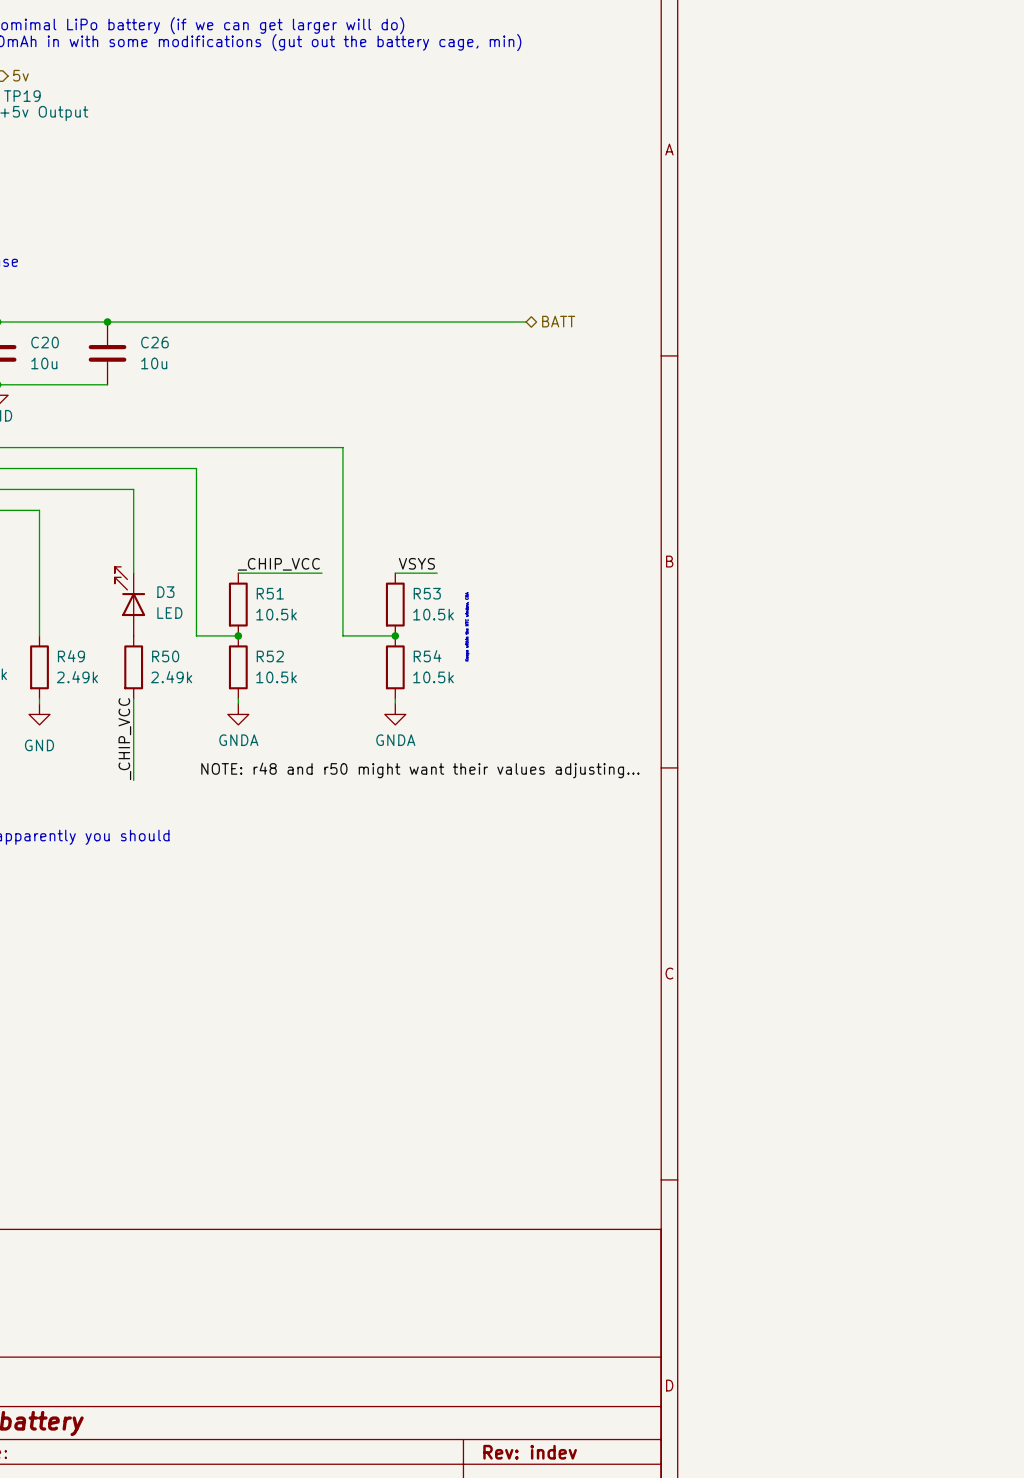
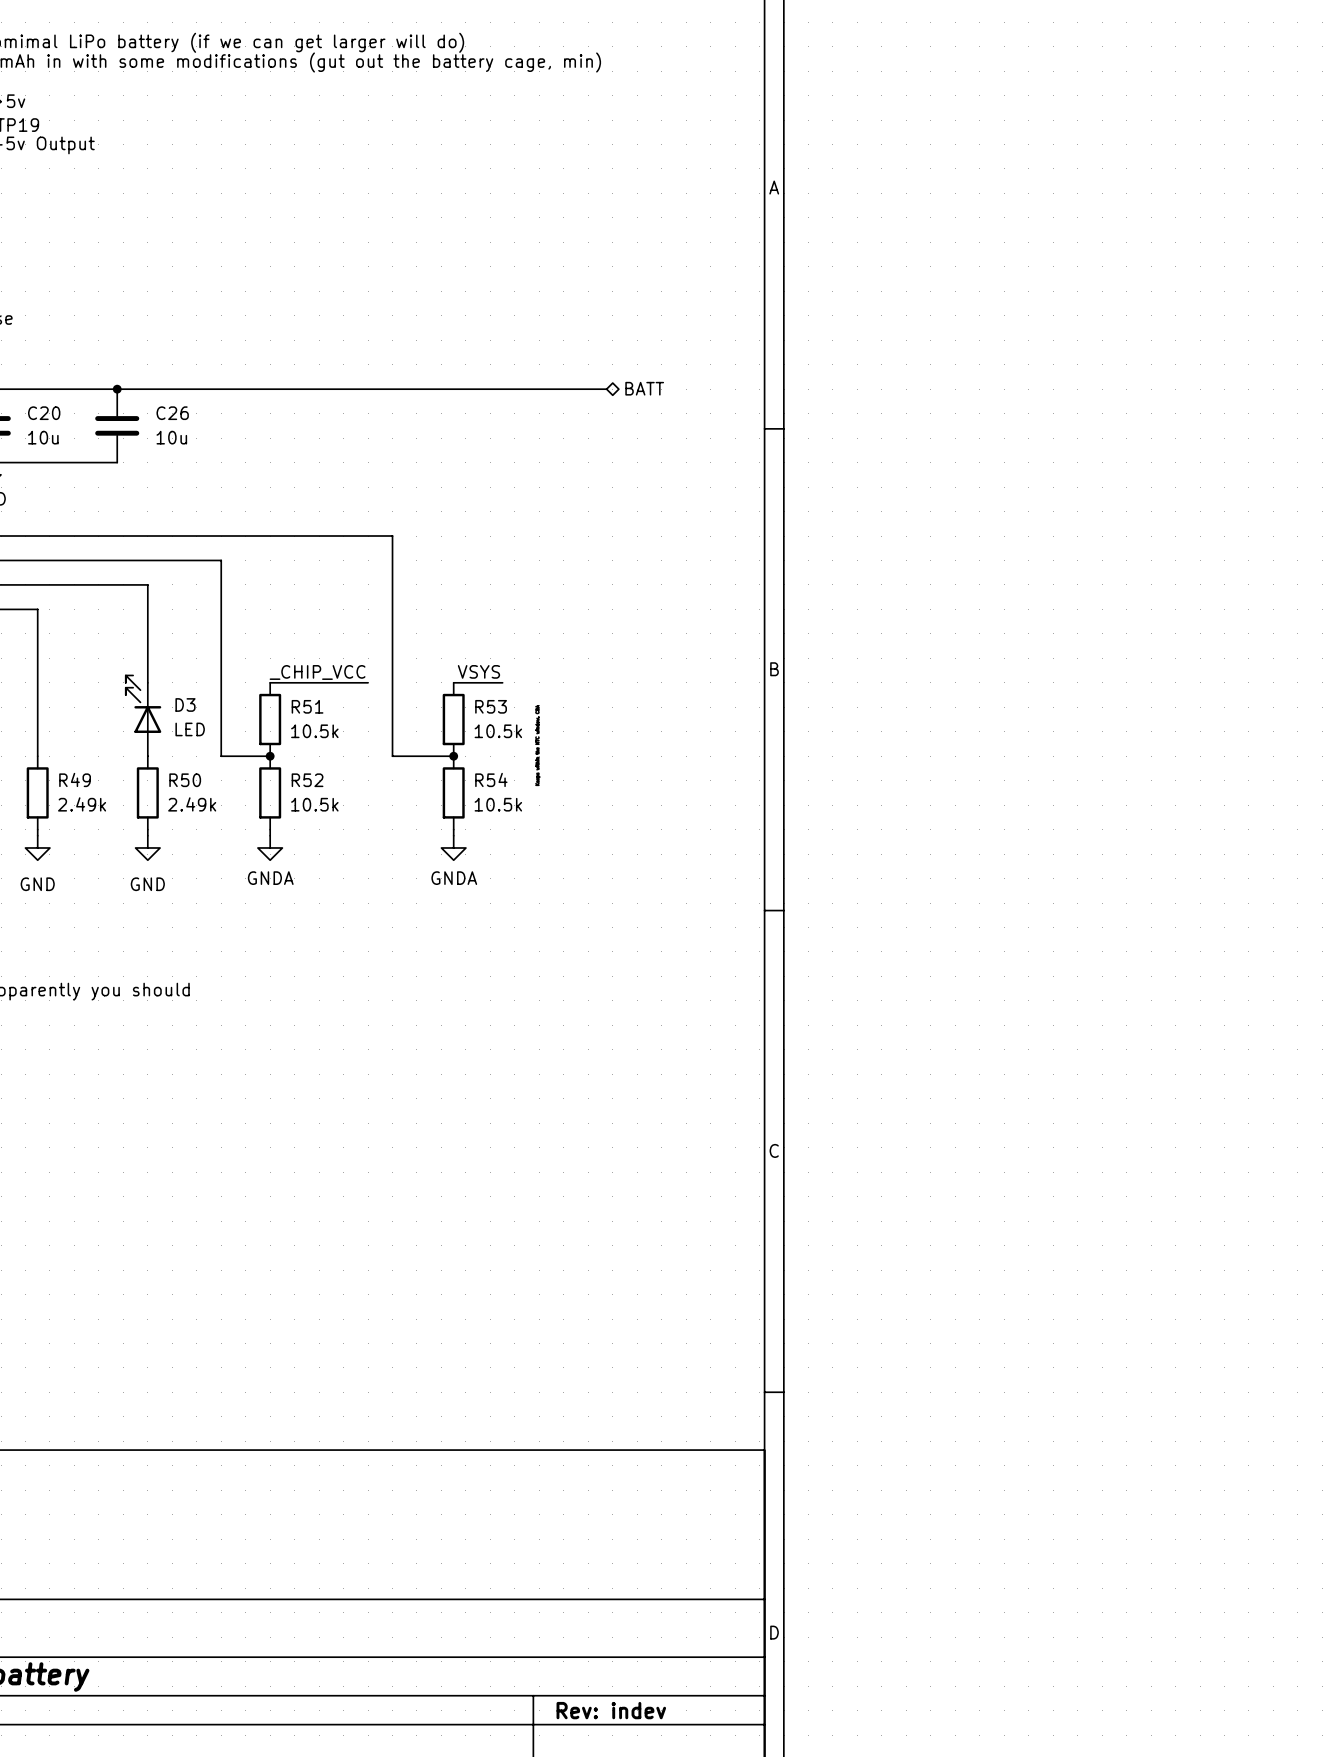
wire: (133, 703) (133, 780) -> none
power symbol: none -> GND (147, 847)
label: _CHIP_VCC (124, 739) -> none
label: NOTE: r48 and r50 might want their values adjusting... (420, 770) -> none

